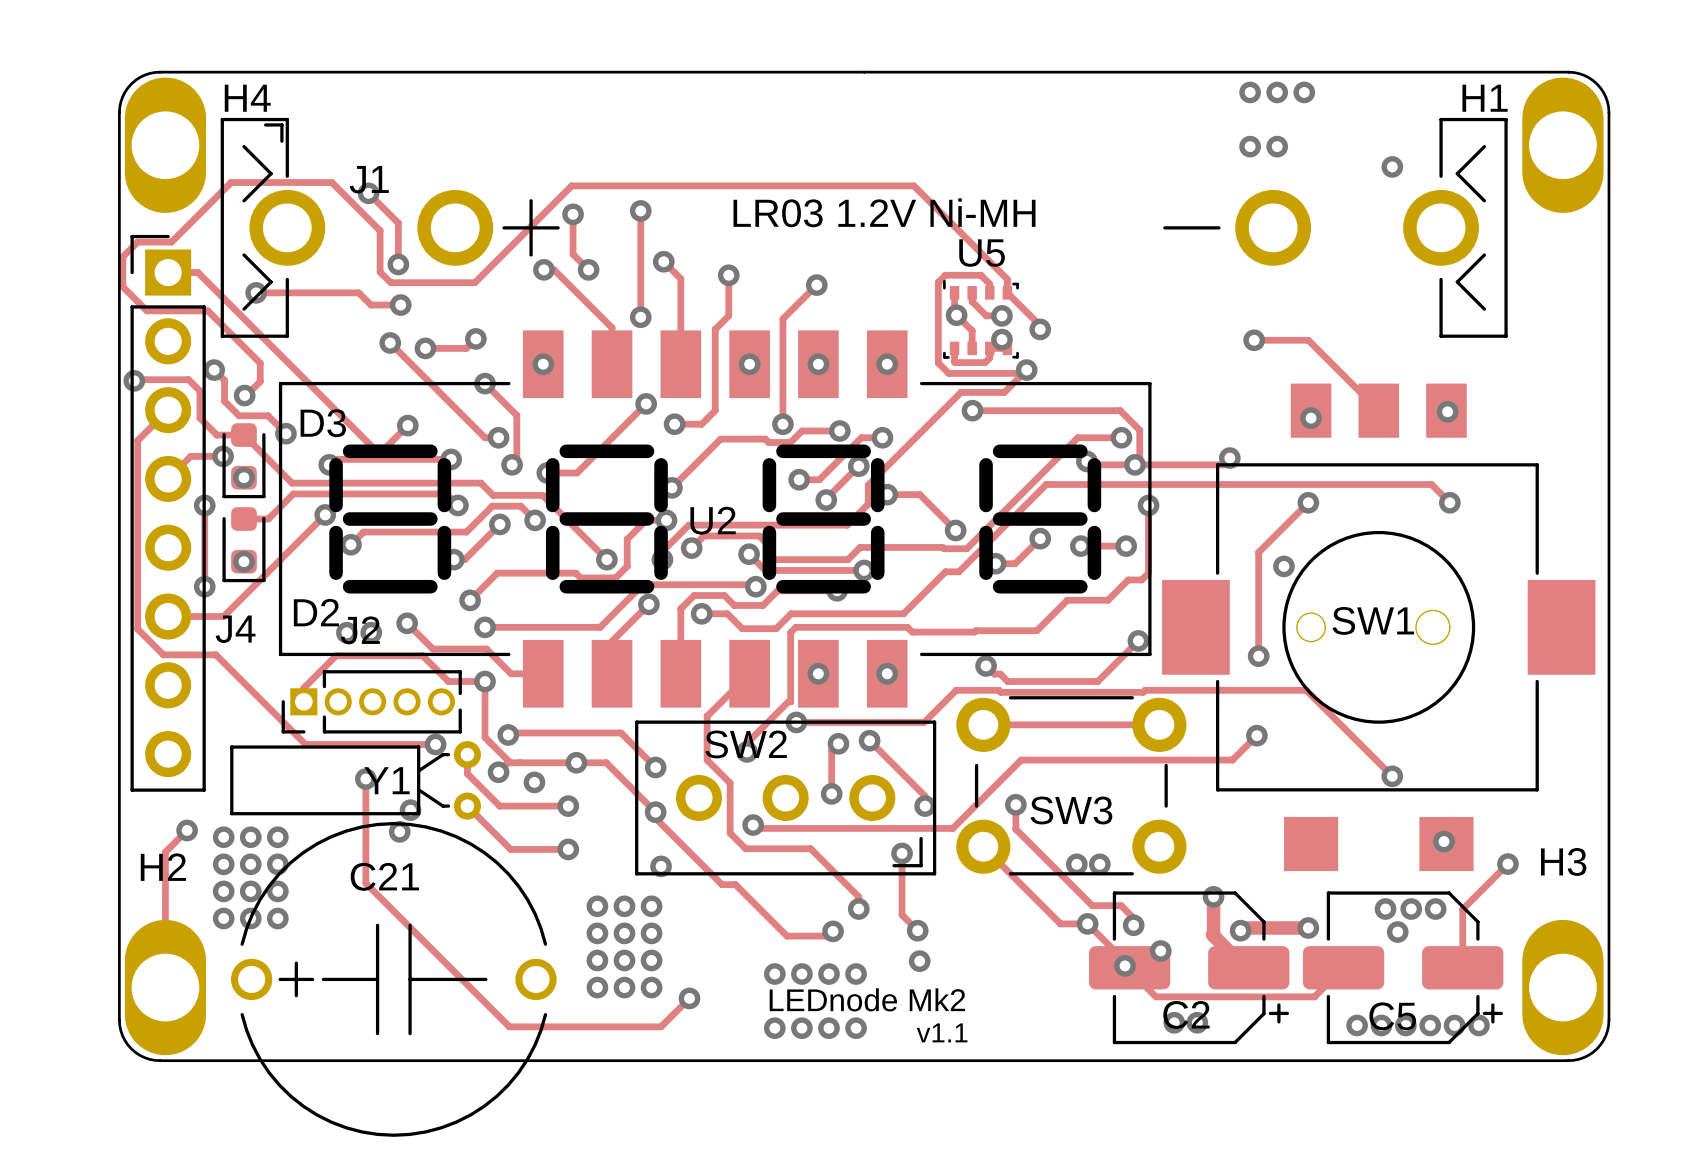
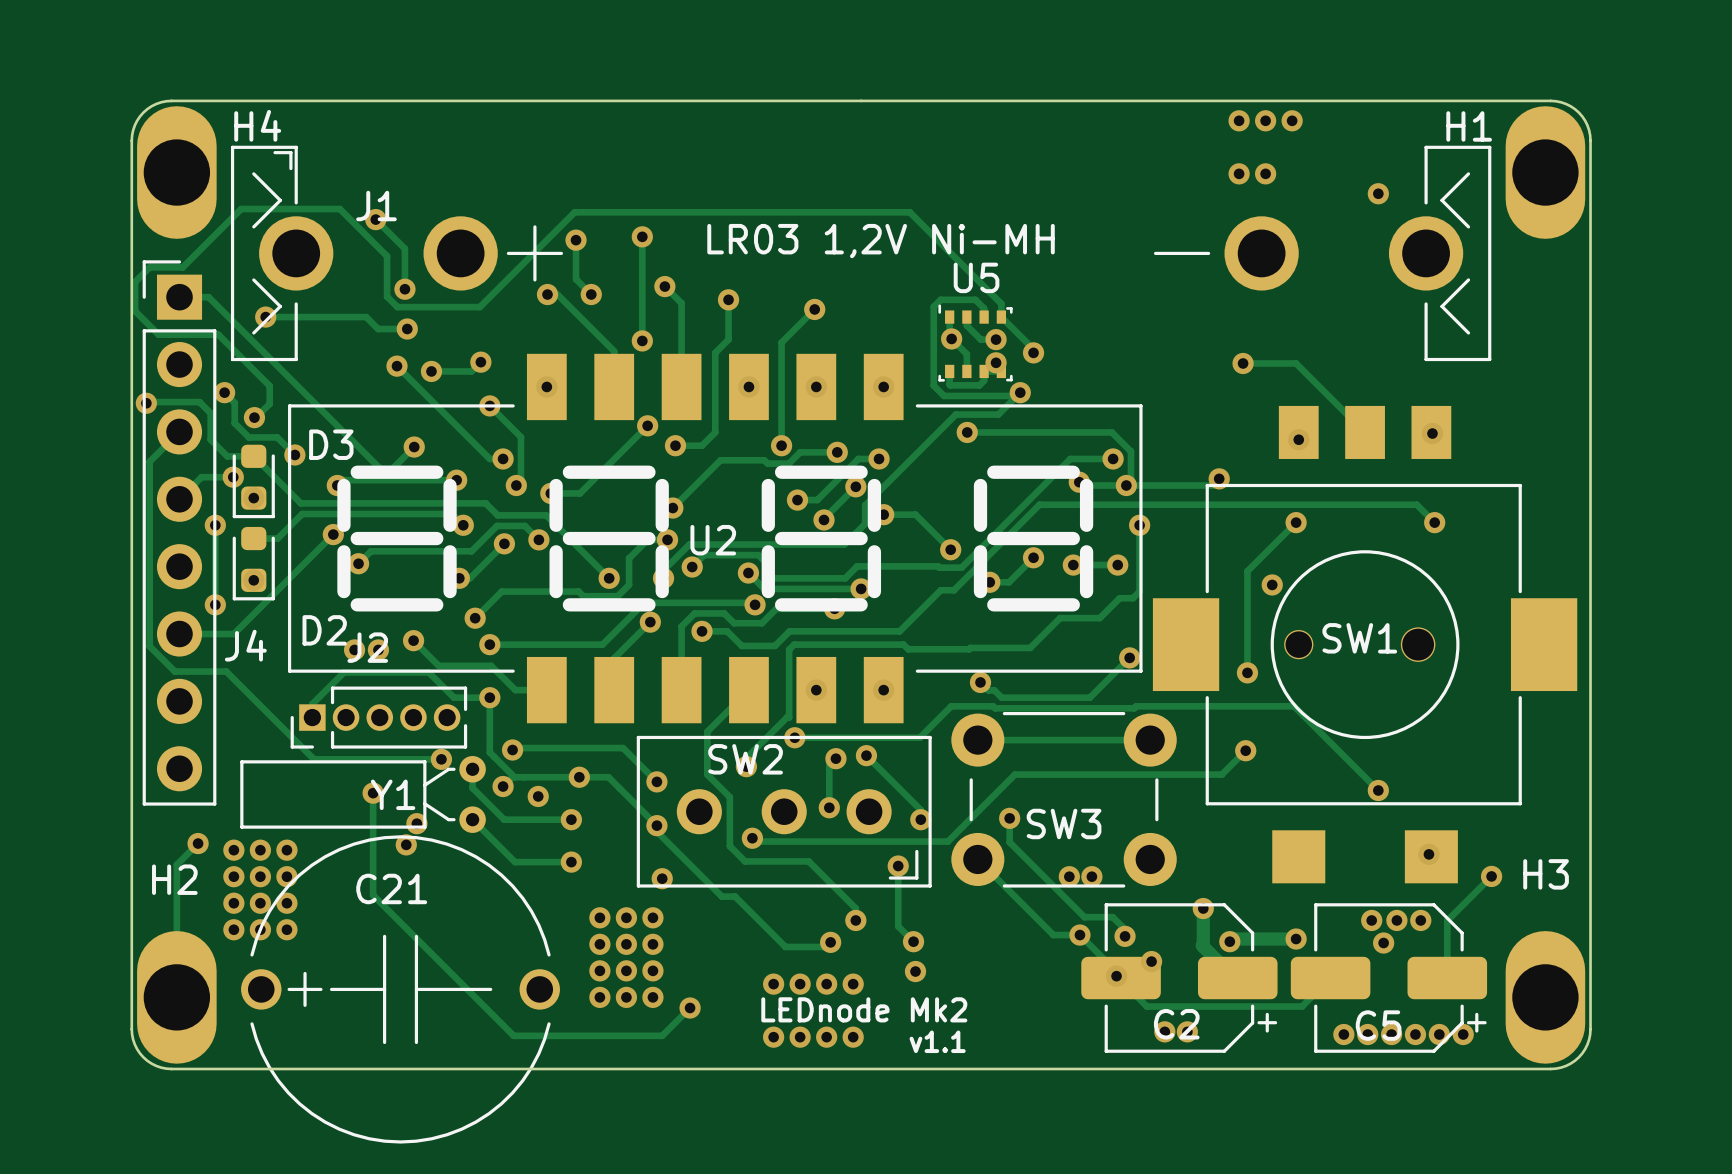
J1 text: LR03 1.2V Ni-MH (884, 212) -> LR03 1,2V Ni-MH (881, 241)

